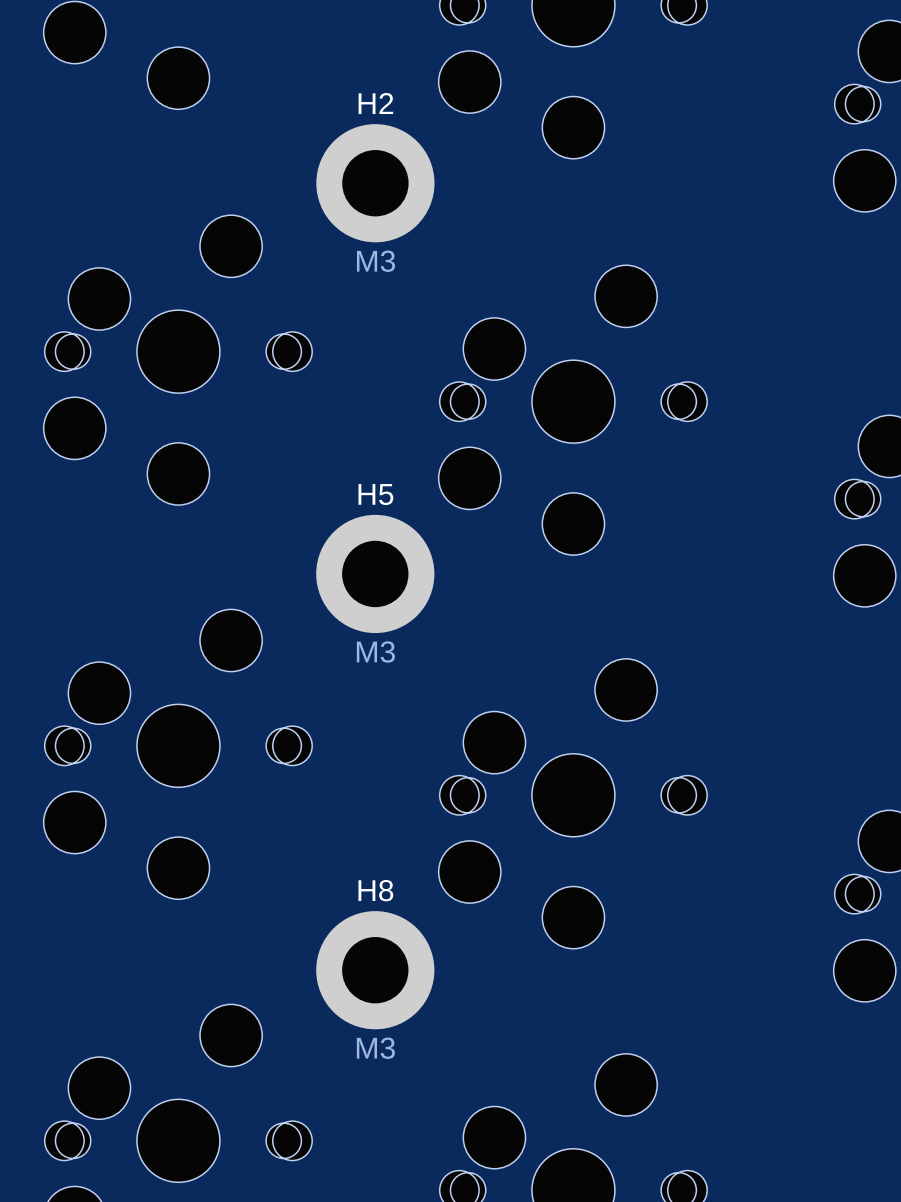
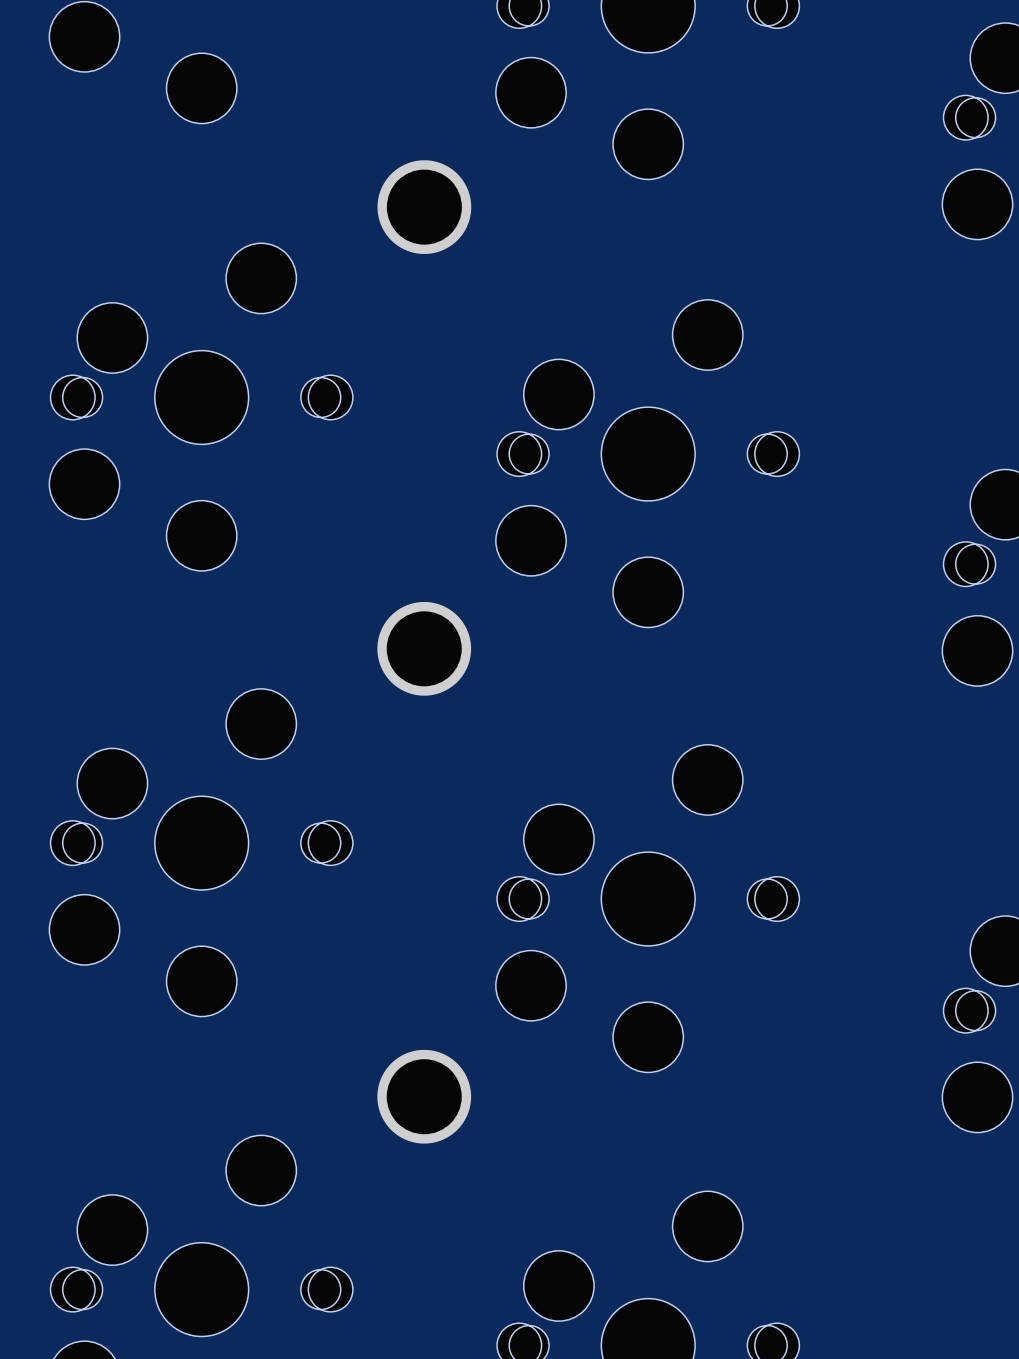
H2: M3 (375, 183) -> none
part: none -> (424, 207)
H5: M3 (375, 573) -> none
part: none -> (424, 648)
H8: M3 (375, 970) -> none
part: none -> (424, 1096)

